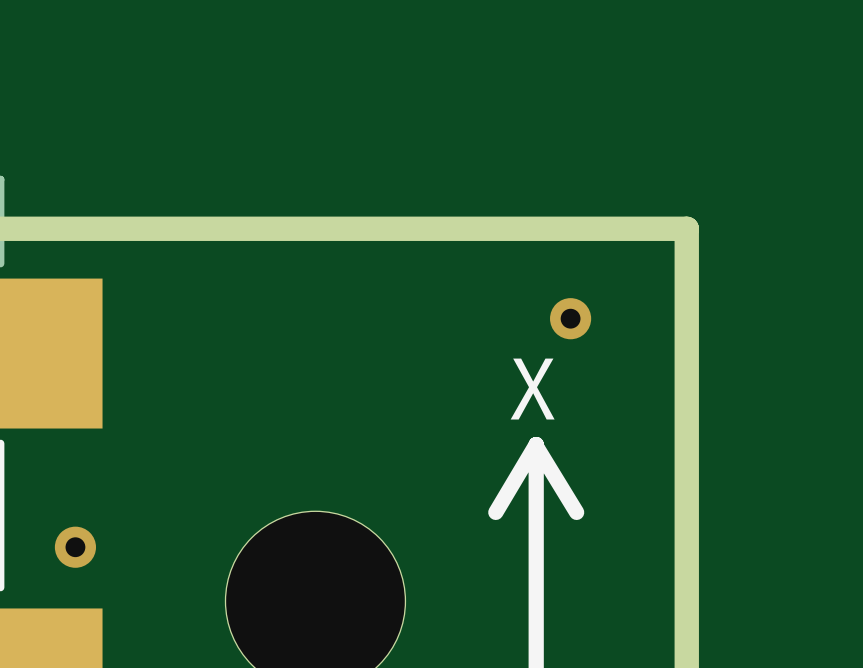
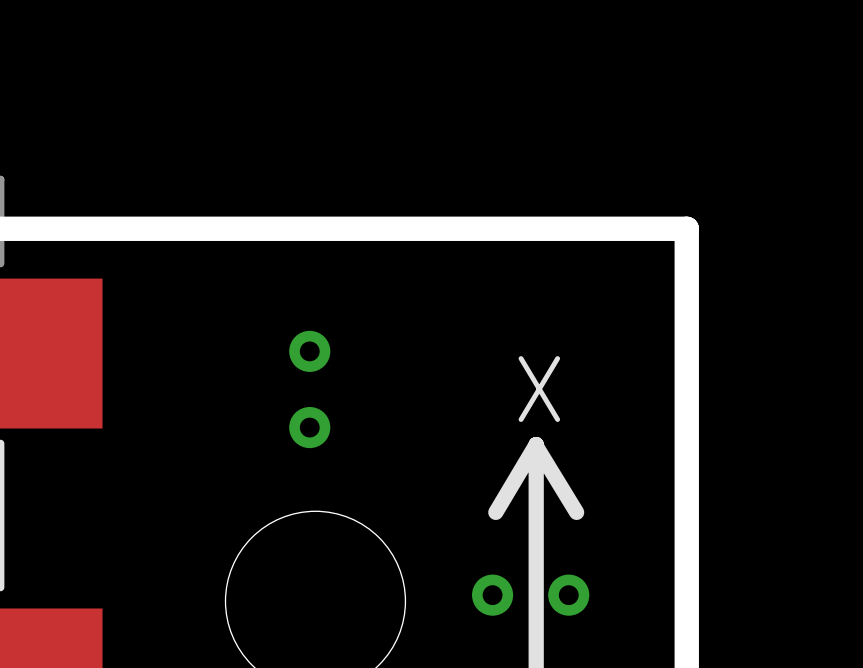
via: (570, 318) -> none
via: none -> (309, 351)
via: none -> (309, 427)
via: (75, 547) -> none
via: none -> (492, 595)
via: none -> (568, 595)

